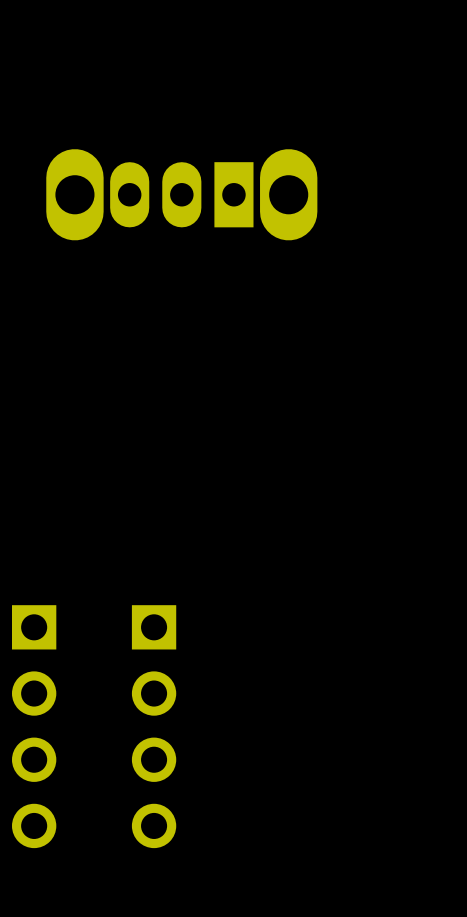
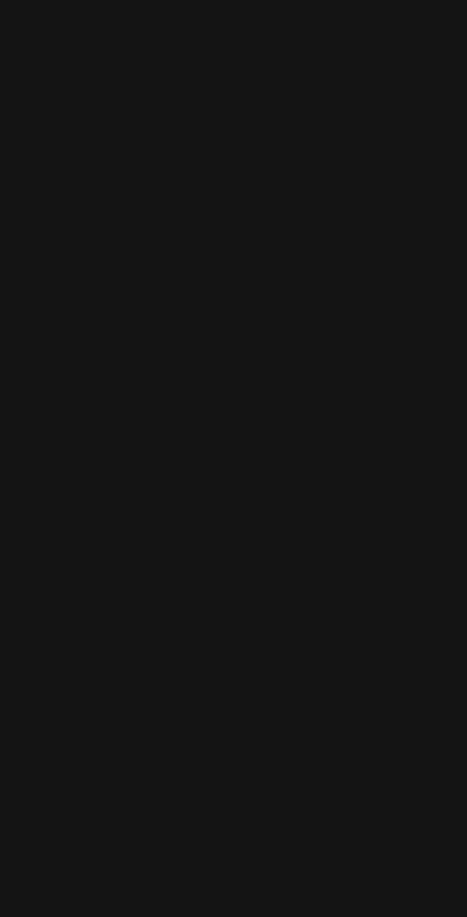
part: (181, 194) -> none
part: (34, 726) -> none
part: (154, 726) -> none

